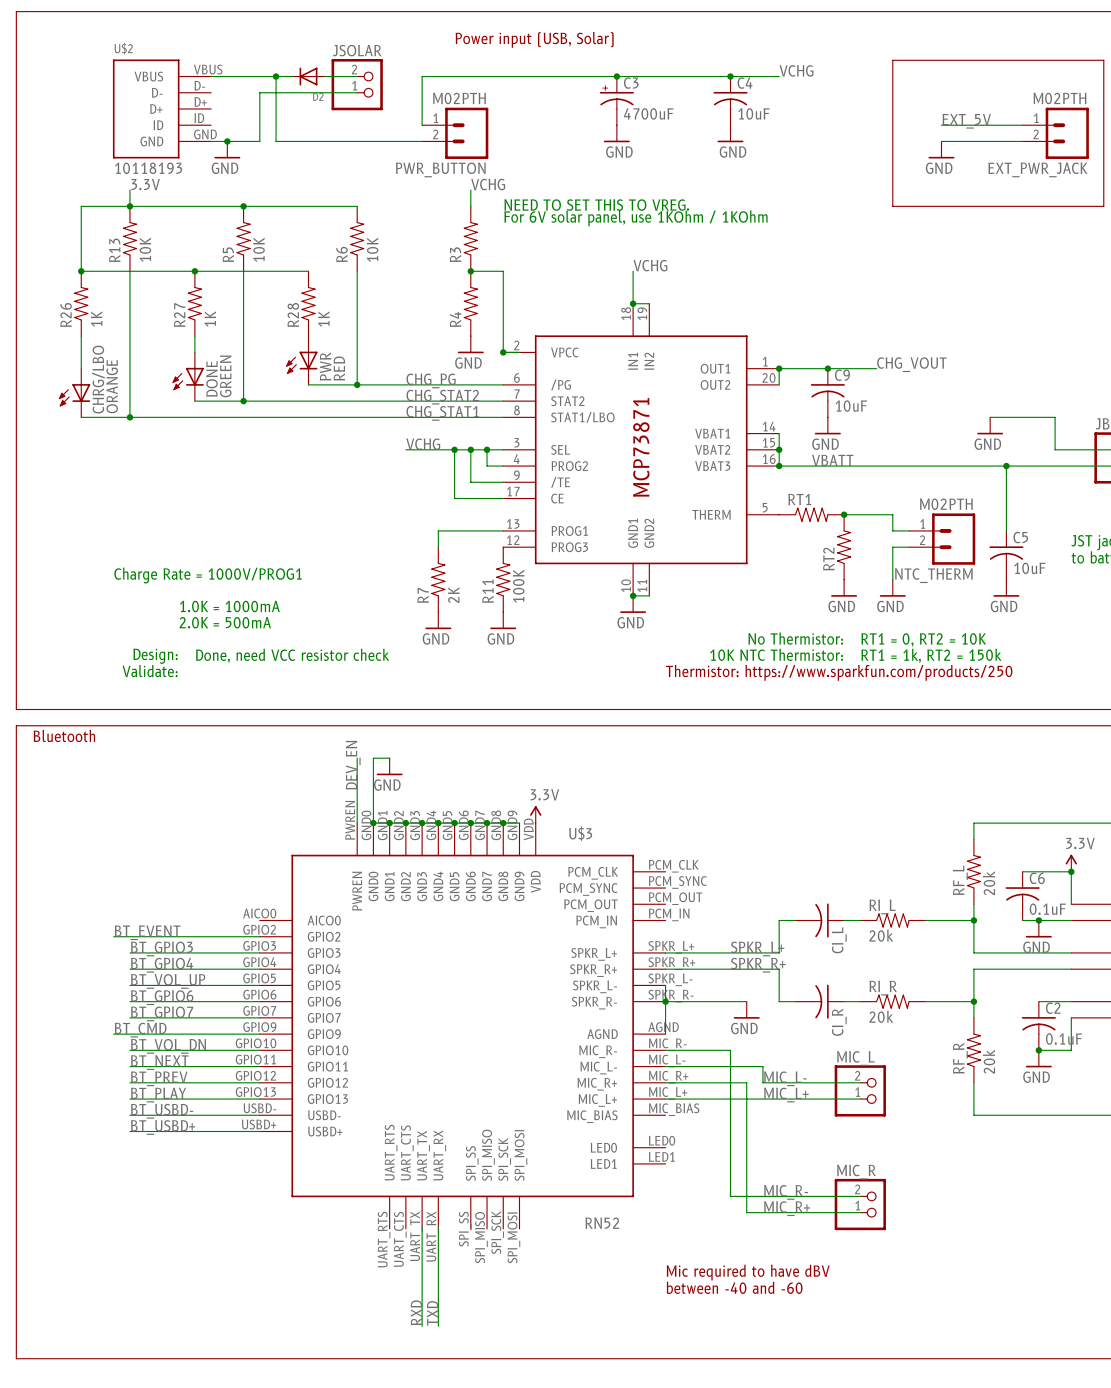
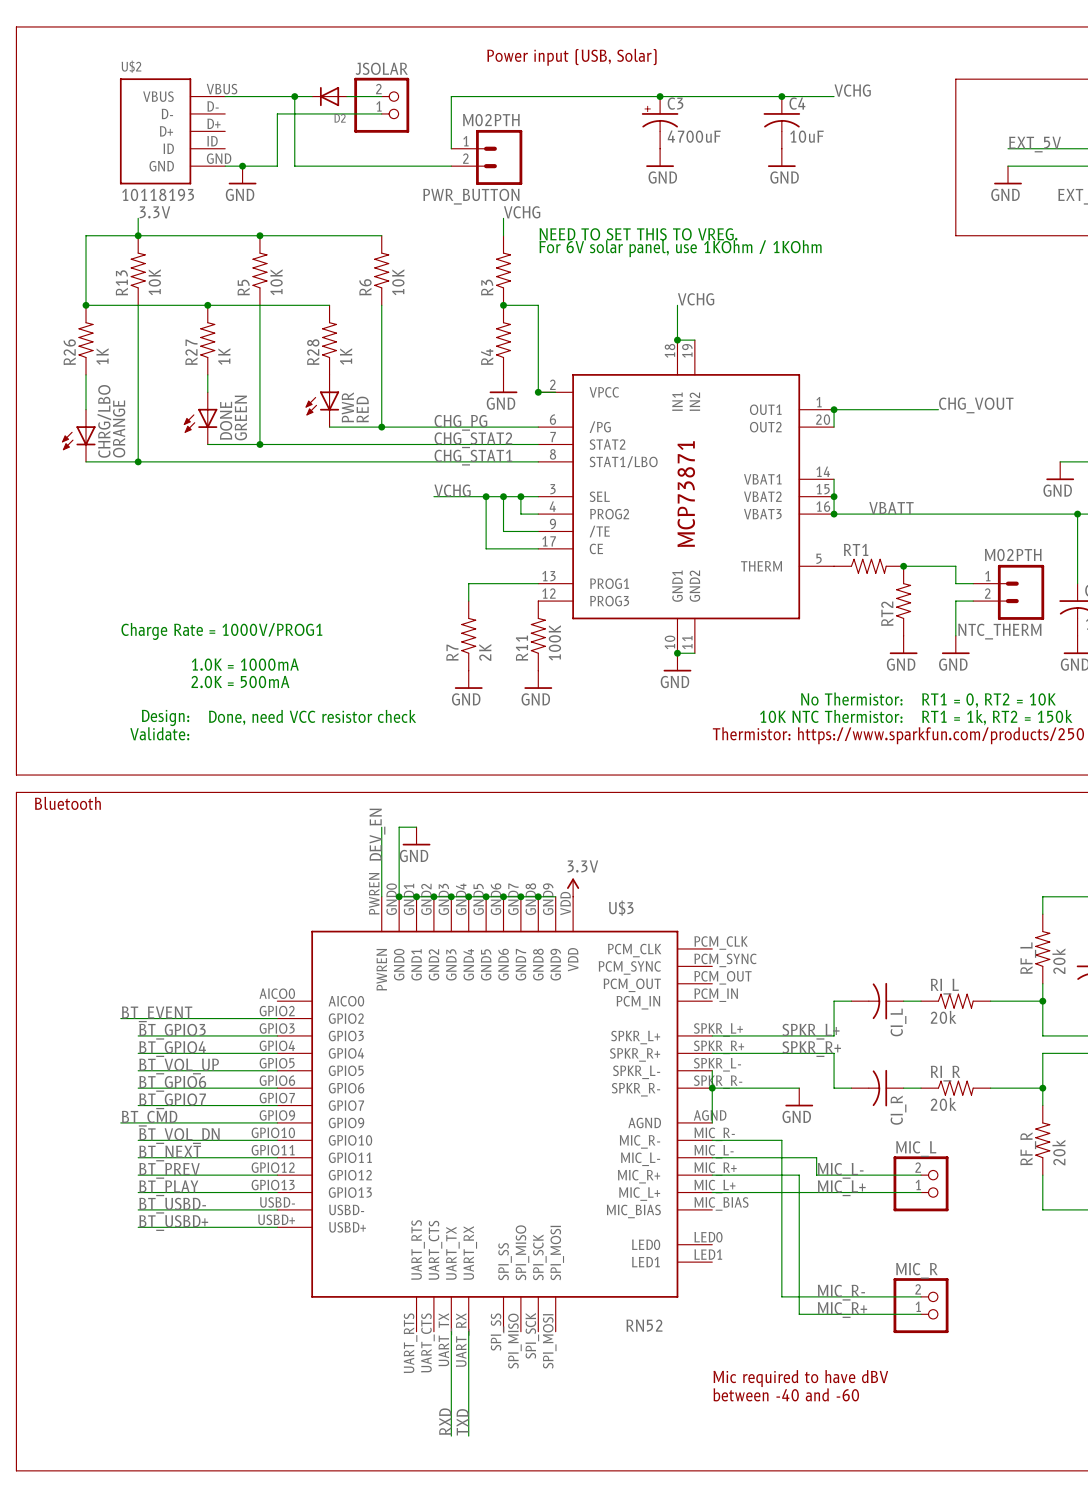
junction: (827, 368) -> none
C9: 10uF (827, 393) -> none
power symbol: GND (827, 425) -> none

